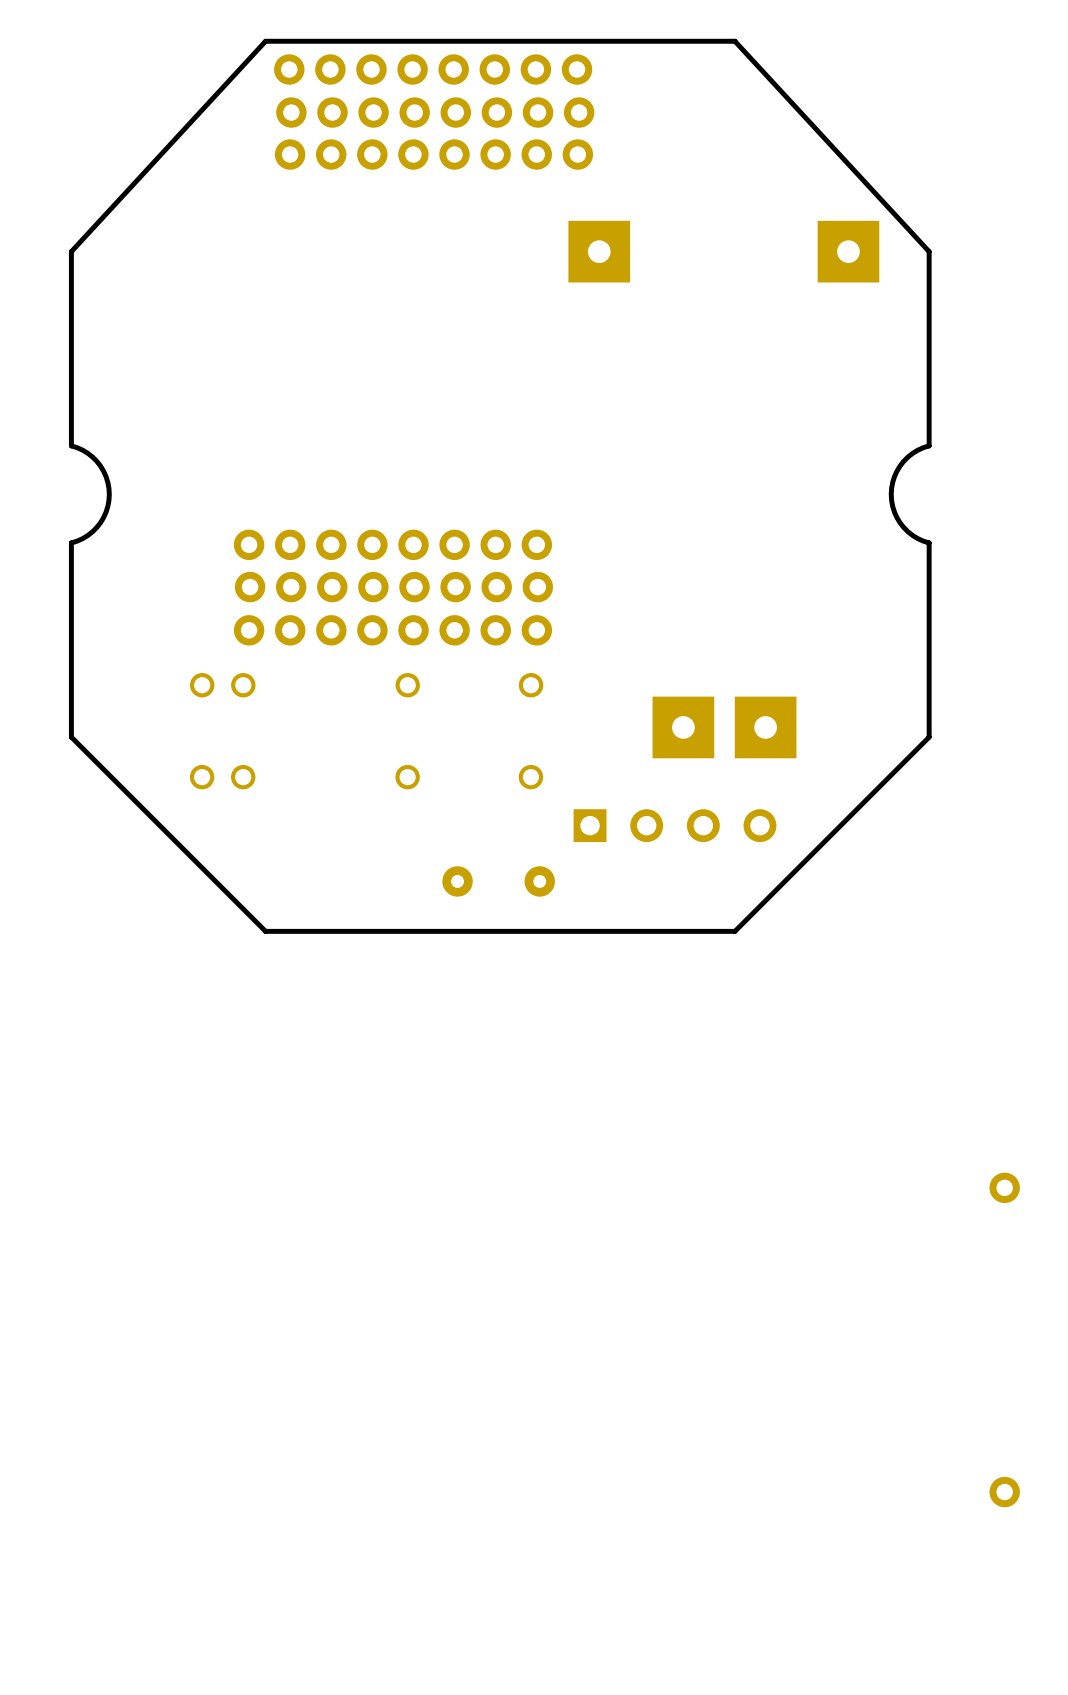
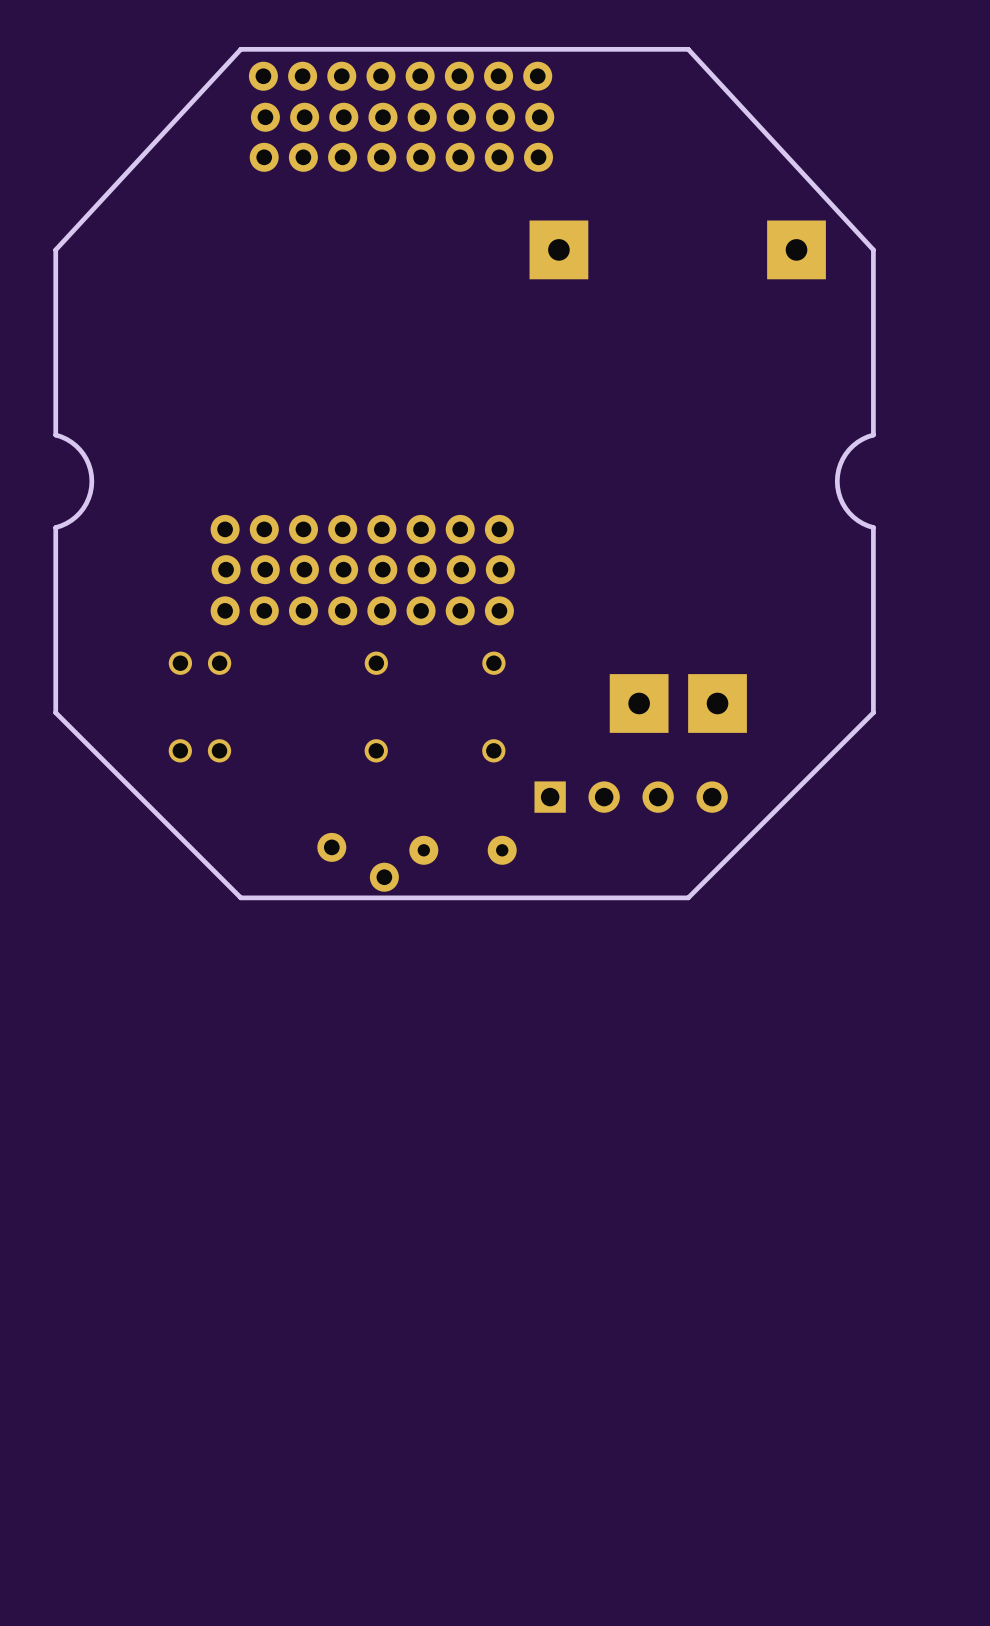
part: none -> (331, 847)
part: none -> (384, 877)
part: (1004, 1187) -> none
part: (1004, 1492) -> none

